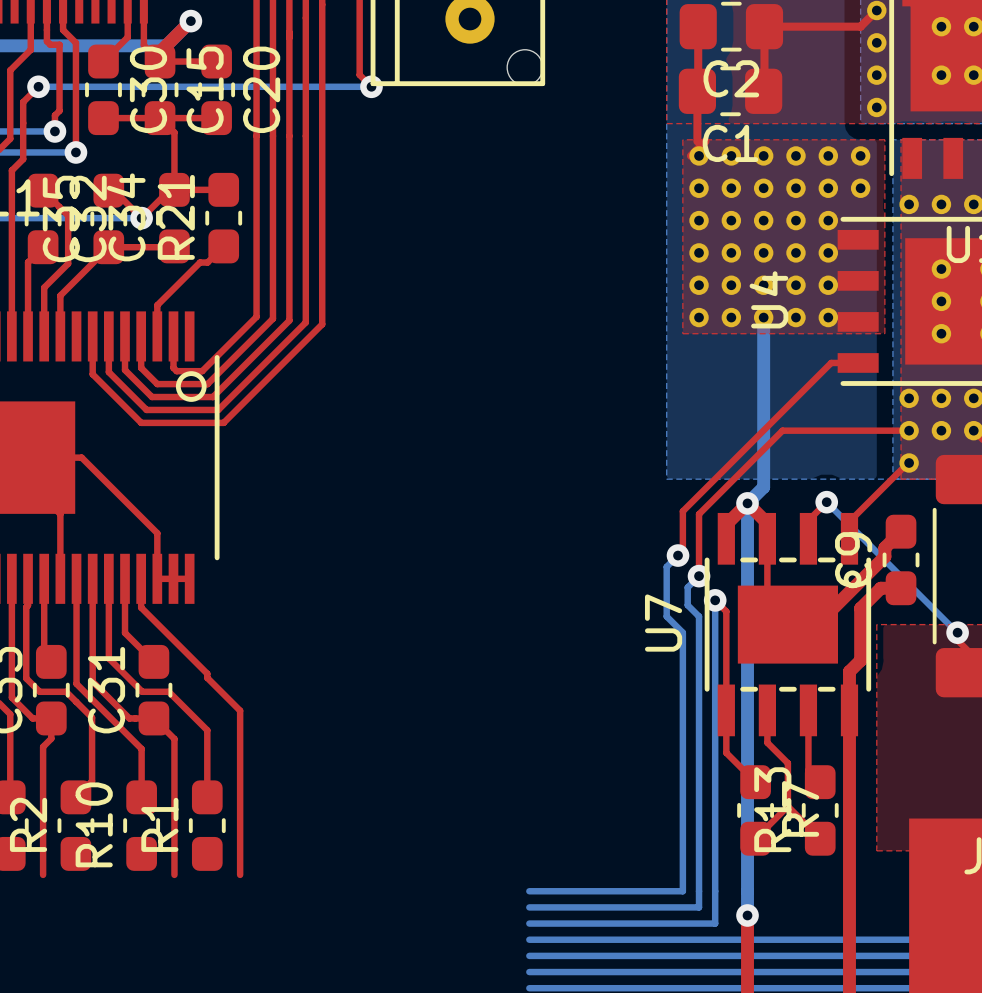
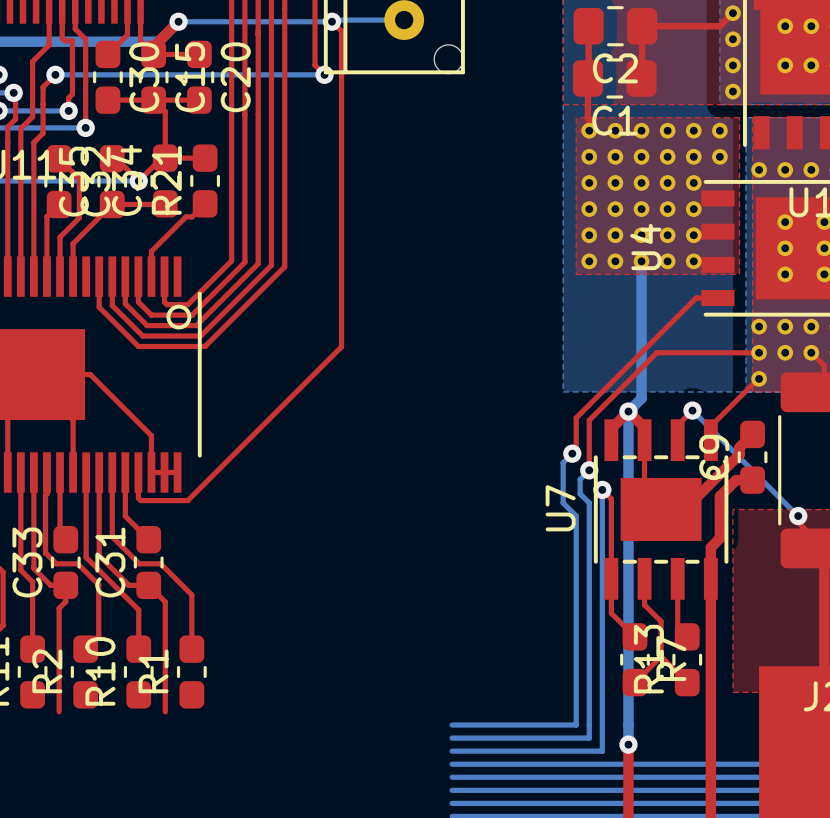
bottom track: none -> (404, 20) (178, 21)
via: none -> (331, 21)
top track: (141, 607) (207, 673) (207, 677) (240, 710) (240, 874) -> (138, 495) (141, 500) (187, 500) (341, 346) (341, 31) (331, 21)

